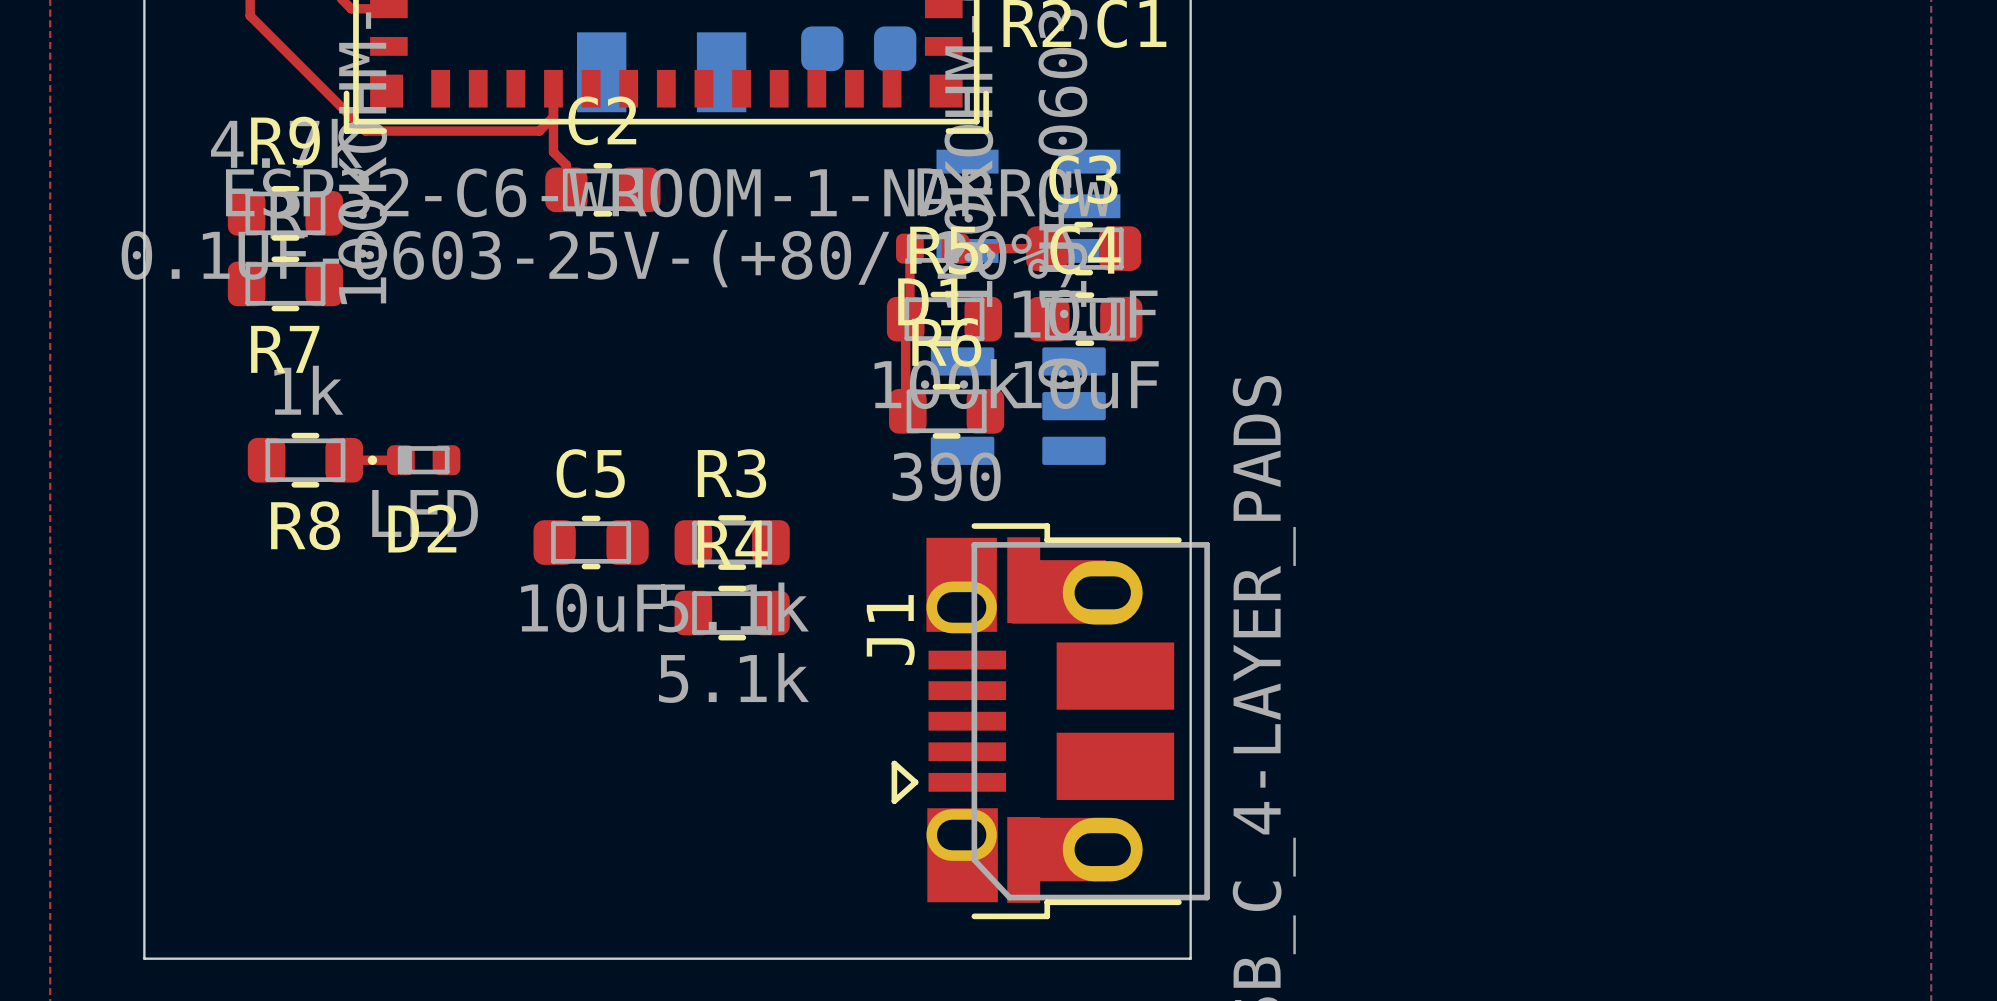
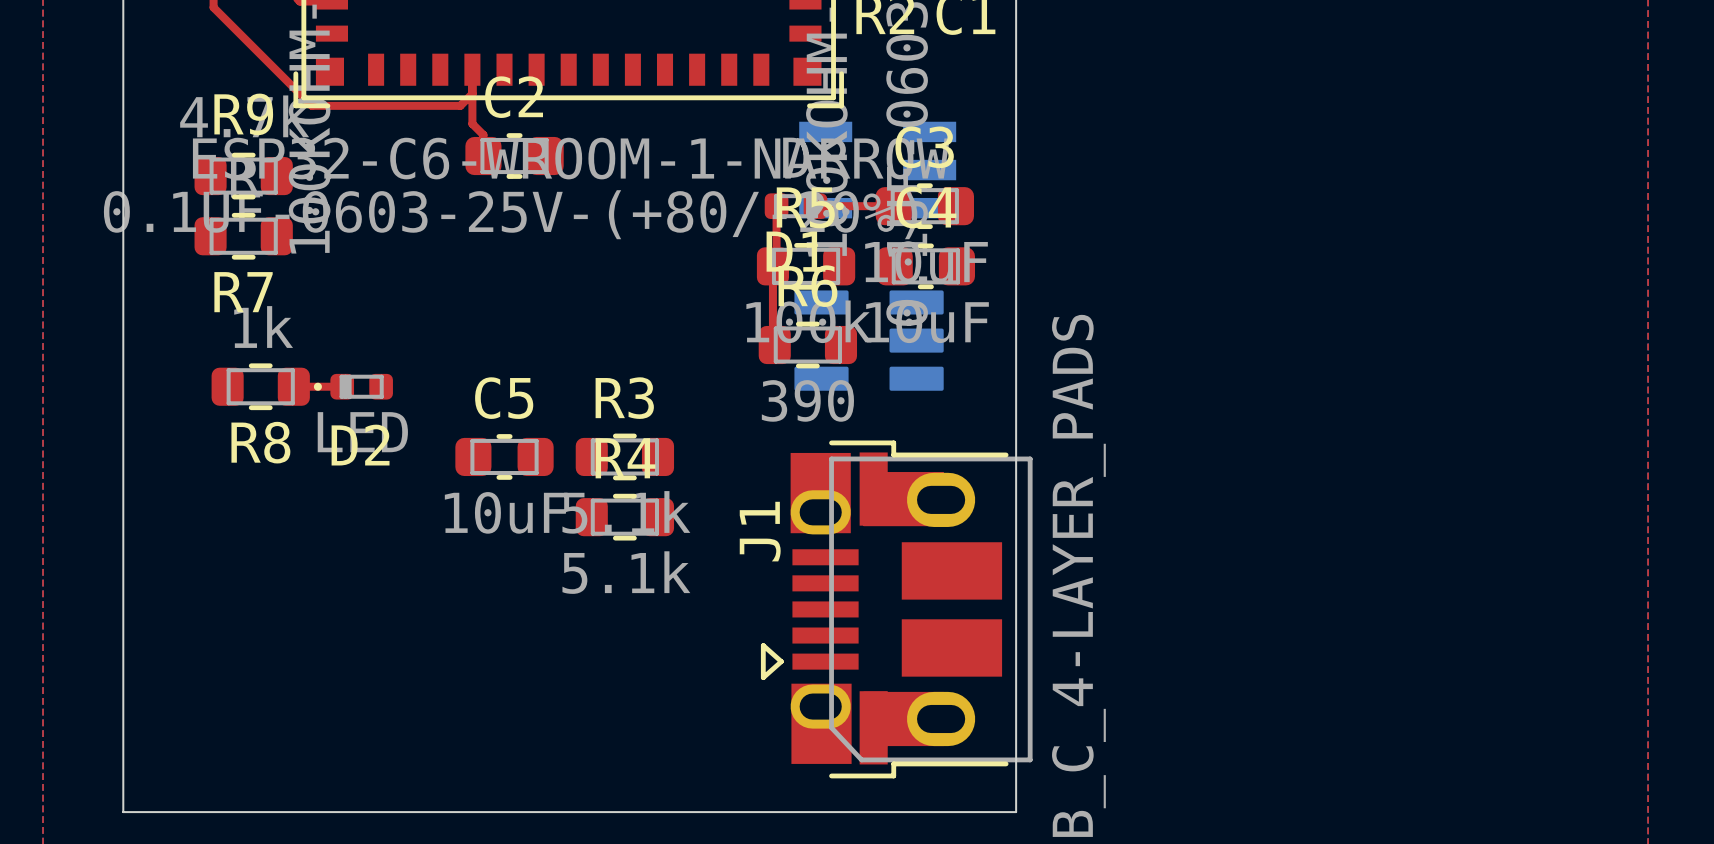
part: (858, 48) -> none
part: (661, 72) -> none

